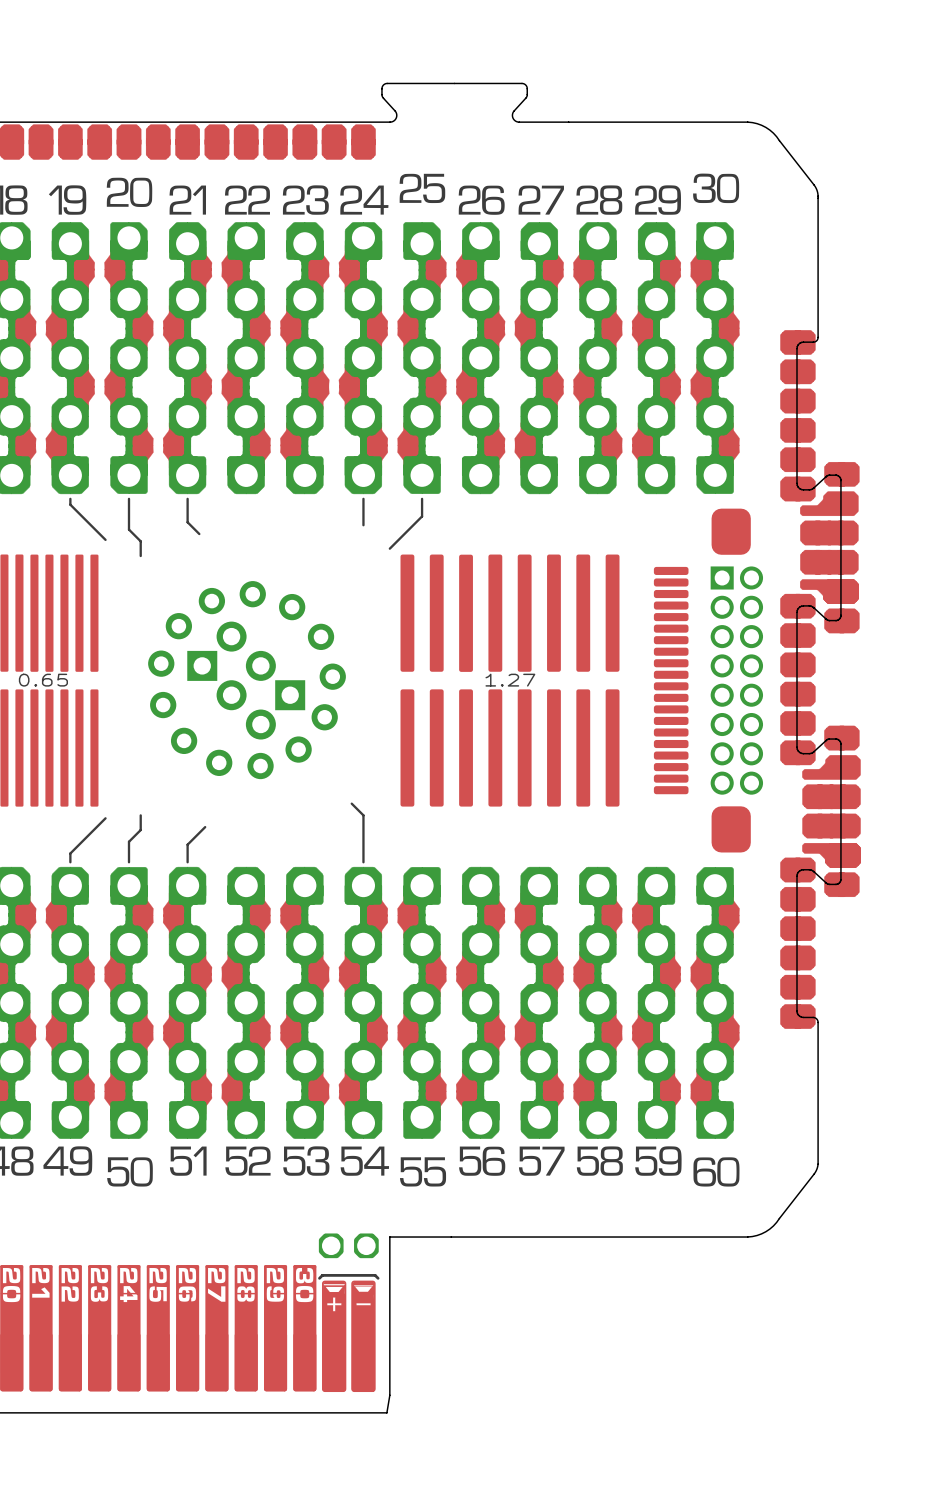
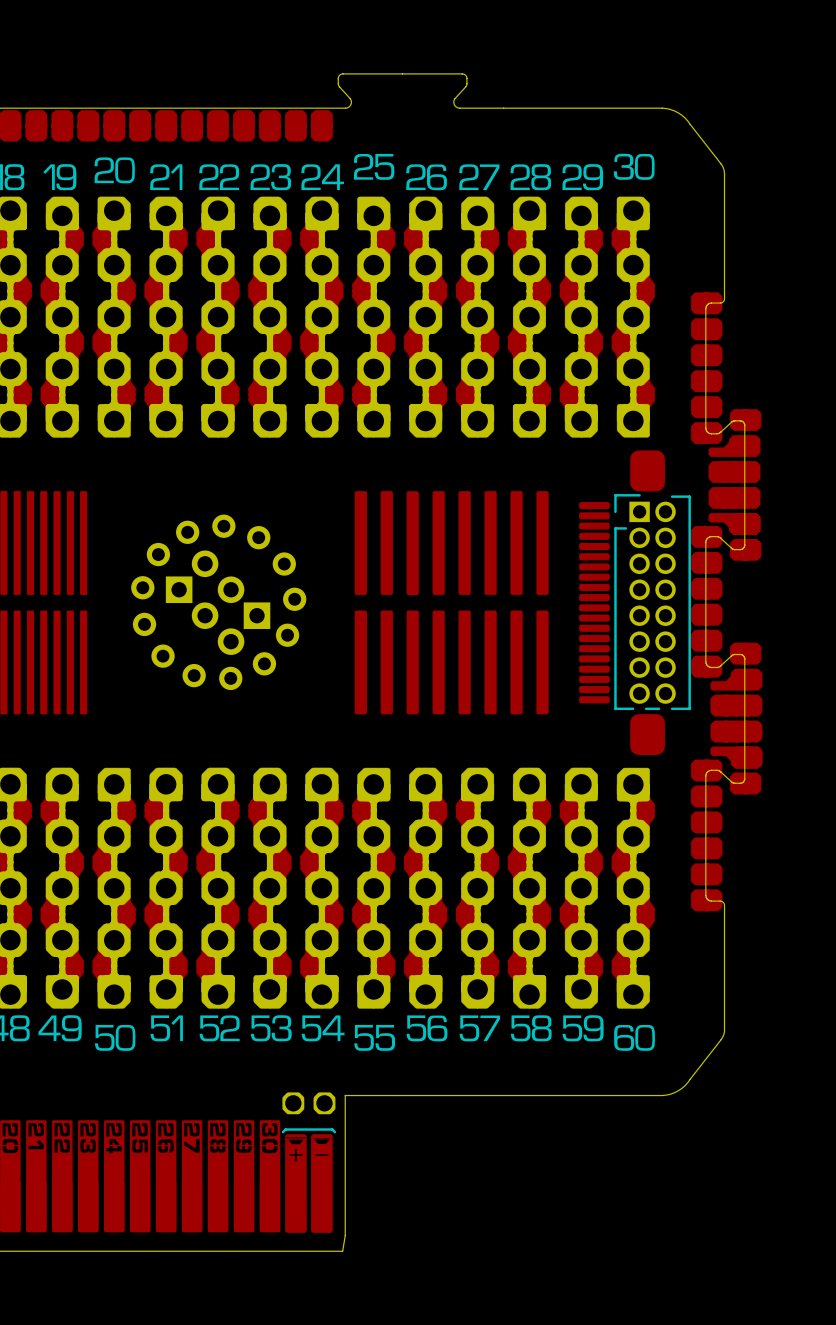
line: (70, 498) (70, 504) (105, 539) -> none
line: (128, 498) (128, 529) (140, 541) (140, 556) -> none
line: (187, 498) (187, 522) (199, 534) -> none
line: (363, 498) (363, 525) -> none
line: (422, 498) (422, 516) (389, 548) -> none
part footprint: [710, 566, 764, 795] -> [614, 494, 691, 711]
text: 0.65 (43, 680) -> none
text: 1.27 (510, 680) -> none
line: (351, 803) (363, 815) (363, 862) -> none
line: (140, 815) (140, 830) (128, 841) (128, 862) -> none
line: (105, 818) (70, 853) (70, 862) -> none
line: (205, 827) (187, 844) (187, 862) -> none

